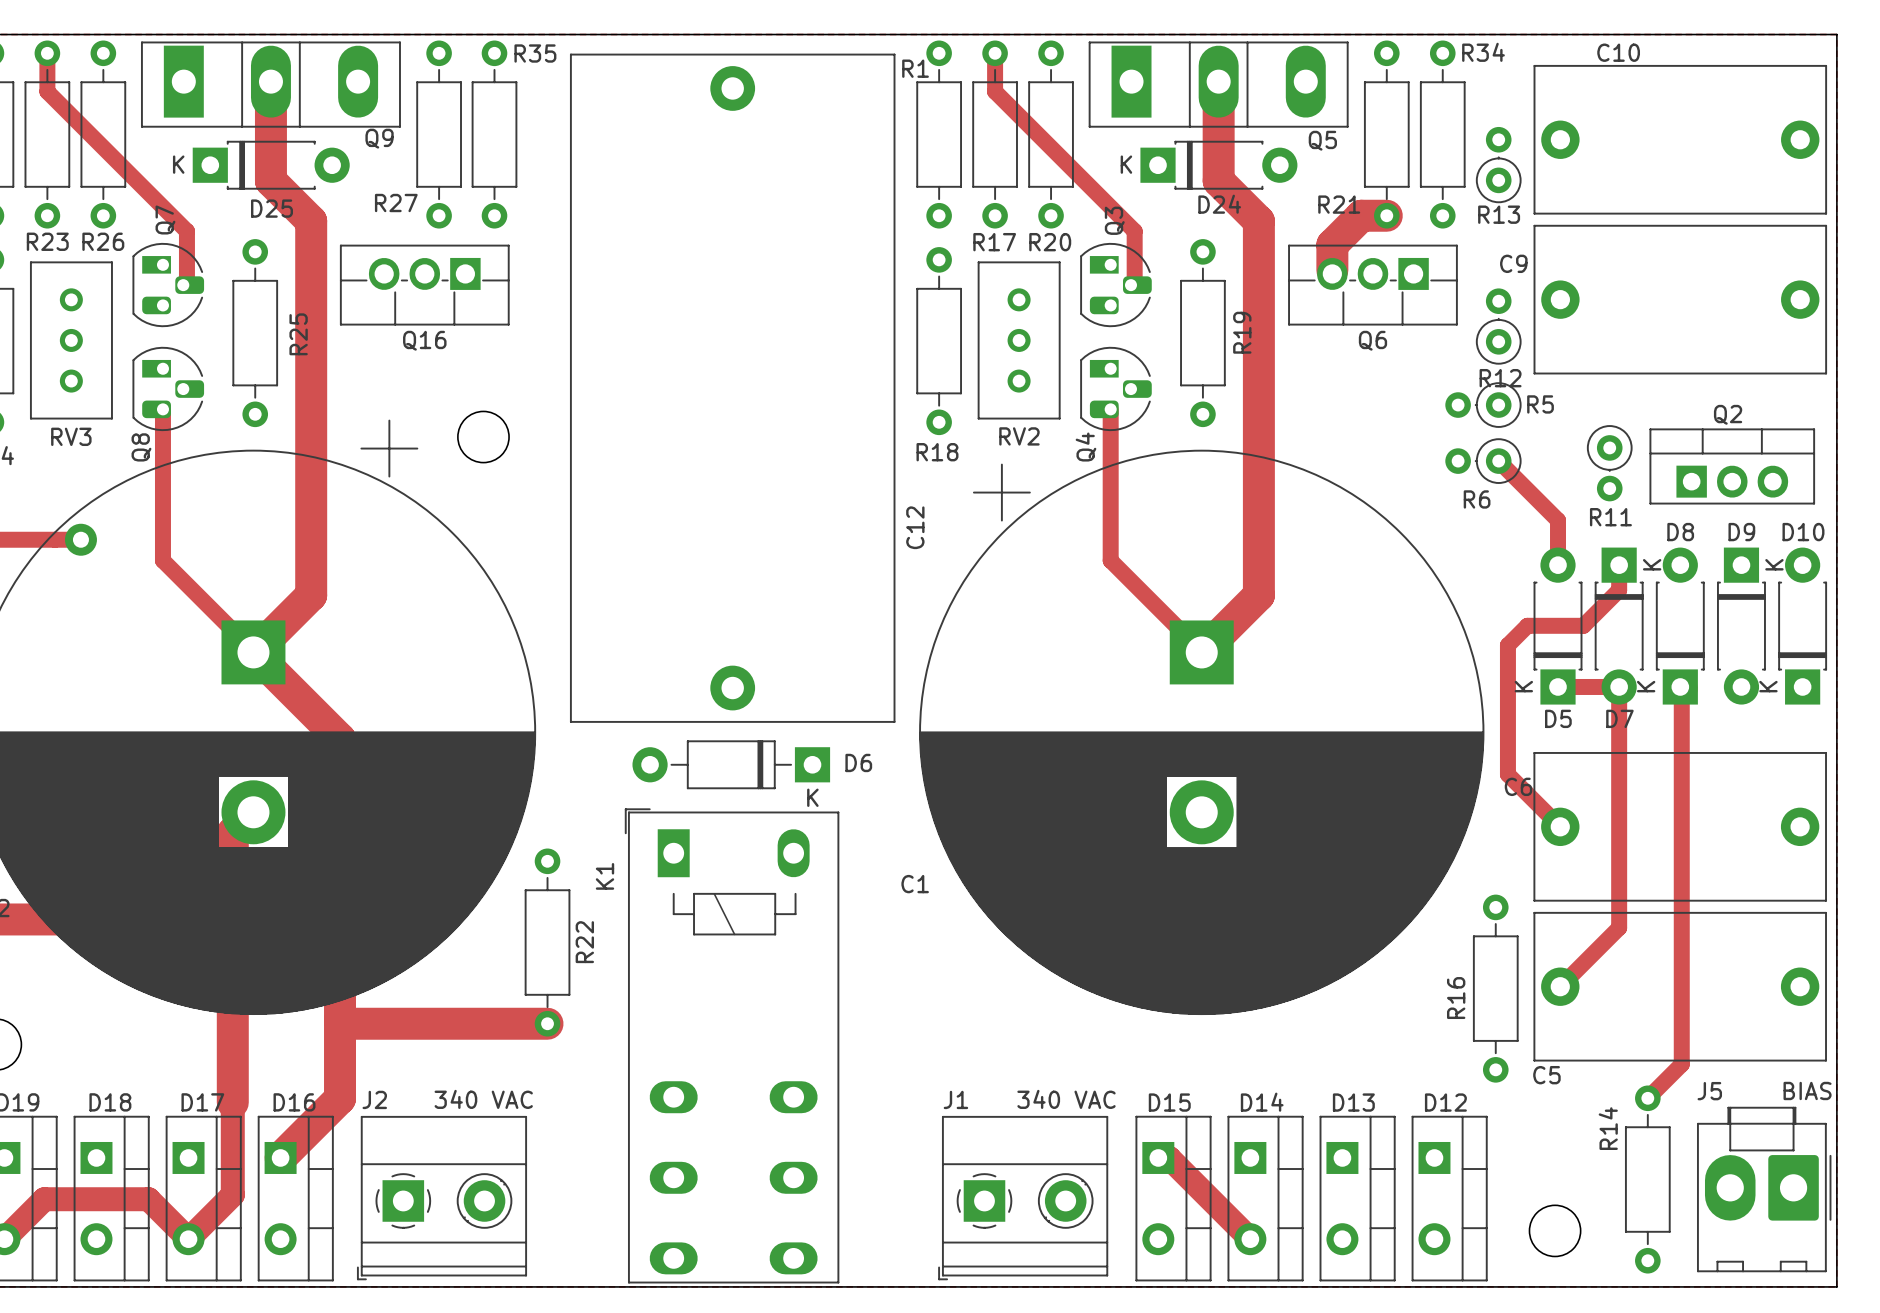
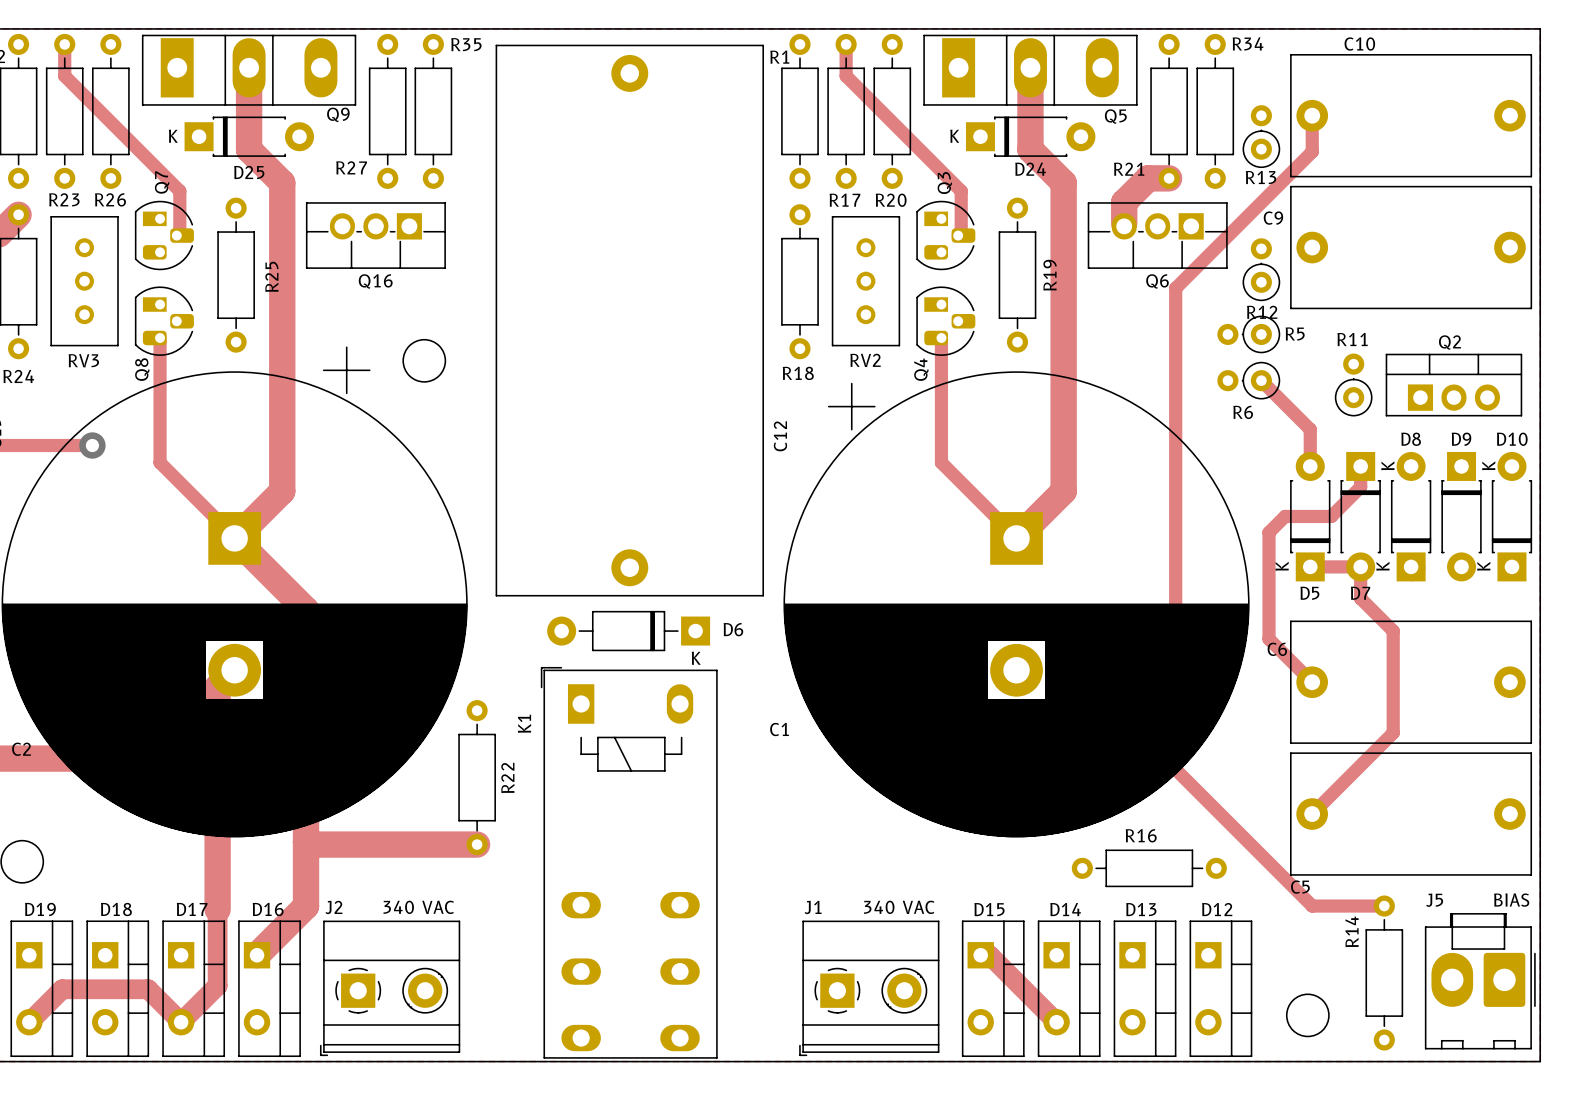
R11 rotation: 0° (1609, 463) -> 180° (1353, 385)
track: (1681, 688) (1681, 1064) (1647, 1098) -> (1312, 115) (1312, 151) (1175, 288) (1175, 769) (1312, 906) (1384, 906)
track: (1619, 725) (1619, 927) -> (1360, 598) (1393, 631) (1393, 732) (1360, 765)
R16 rotation: 0° (1495, 988) -> 90° clockwise (1149, 868)
R16 position: (1495, 988) -> (1149, 868)

